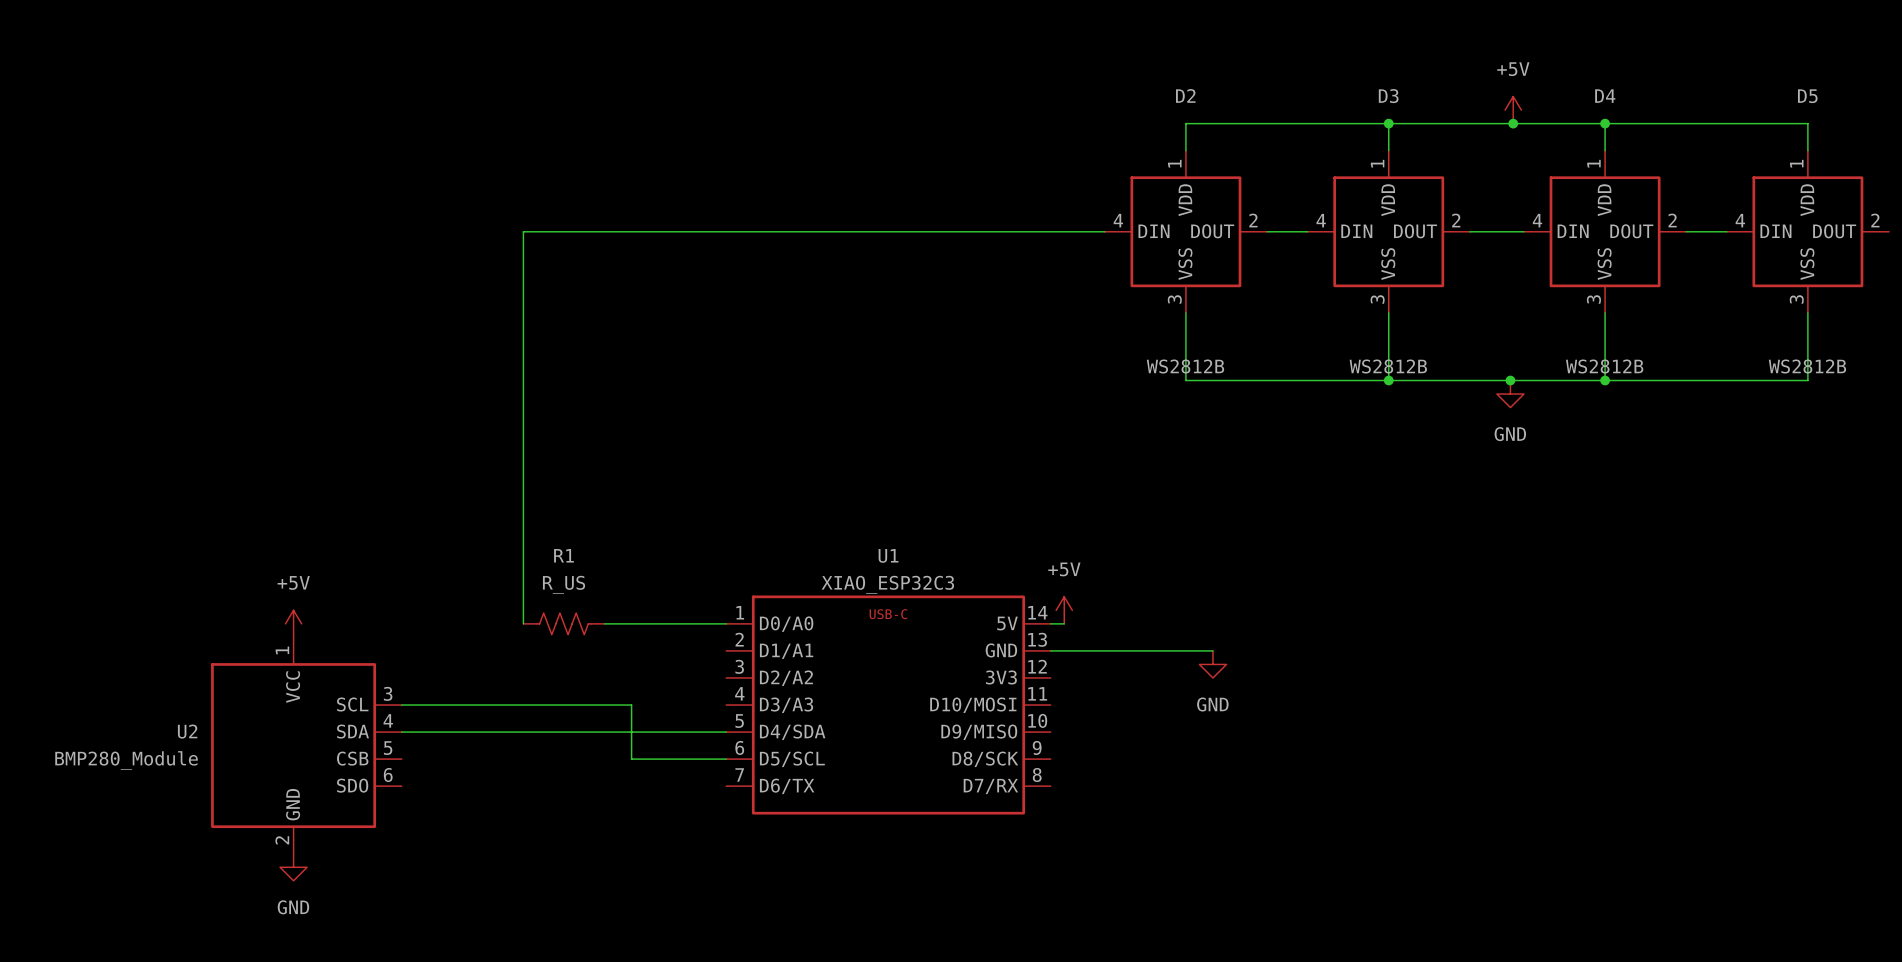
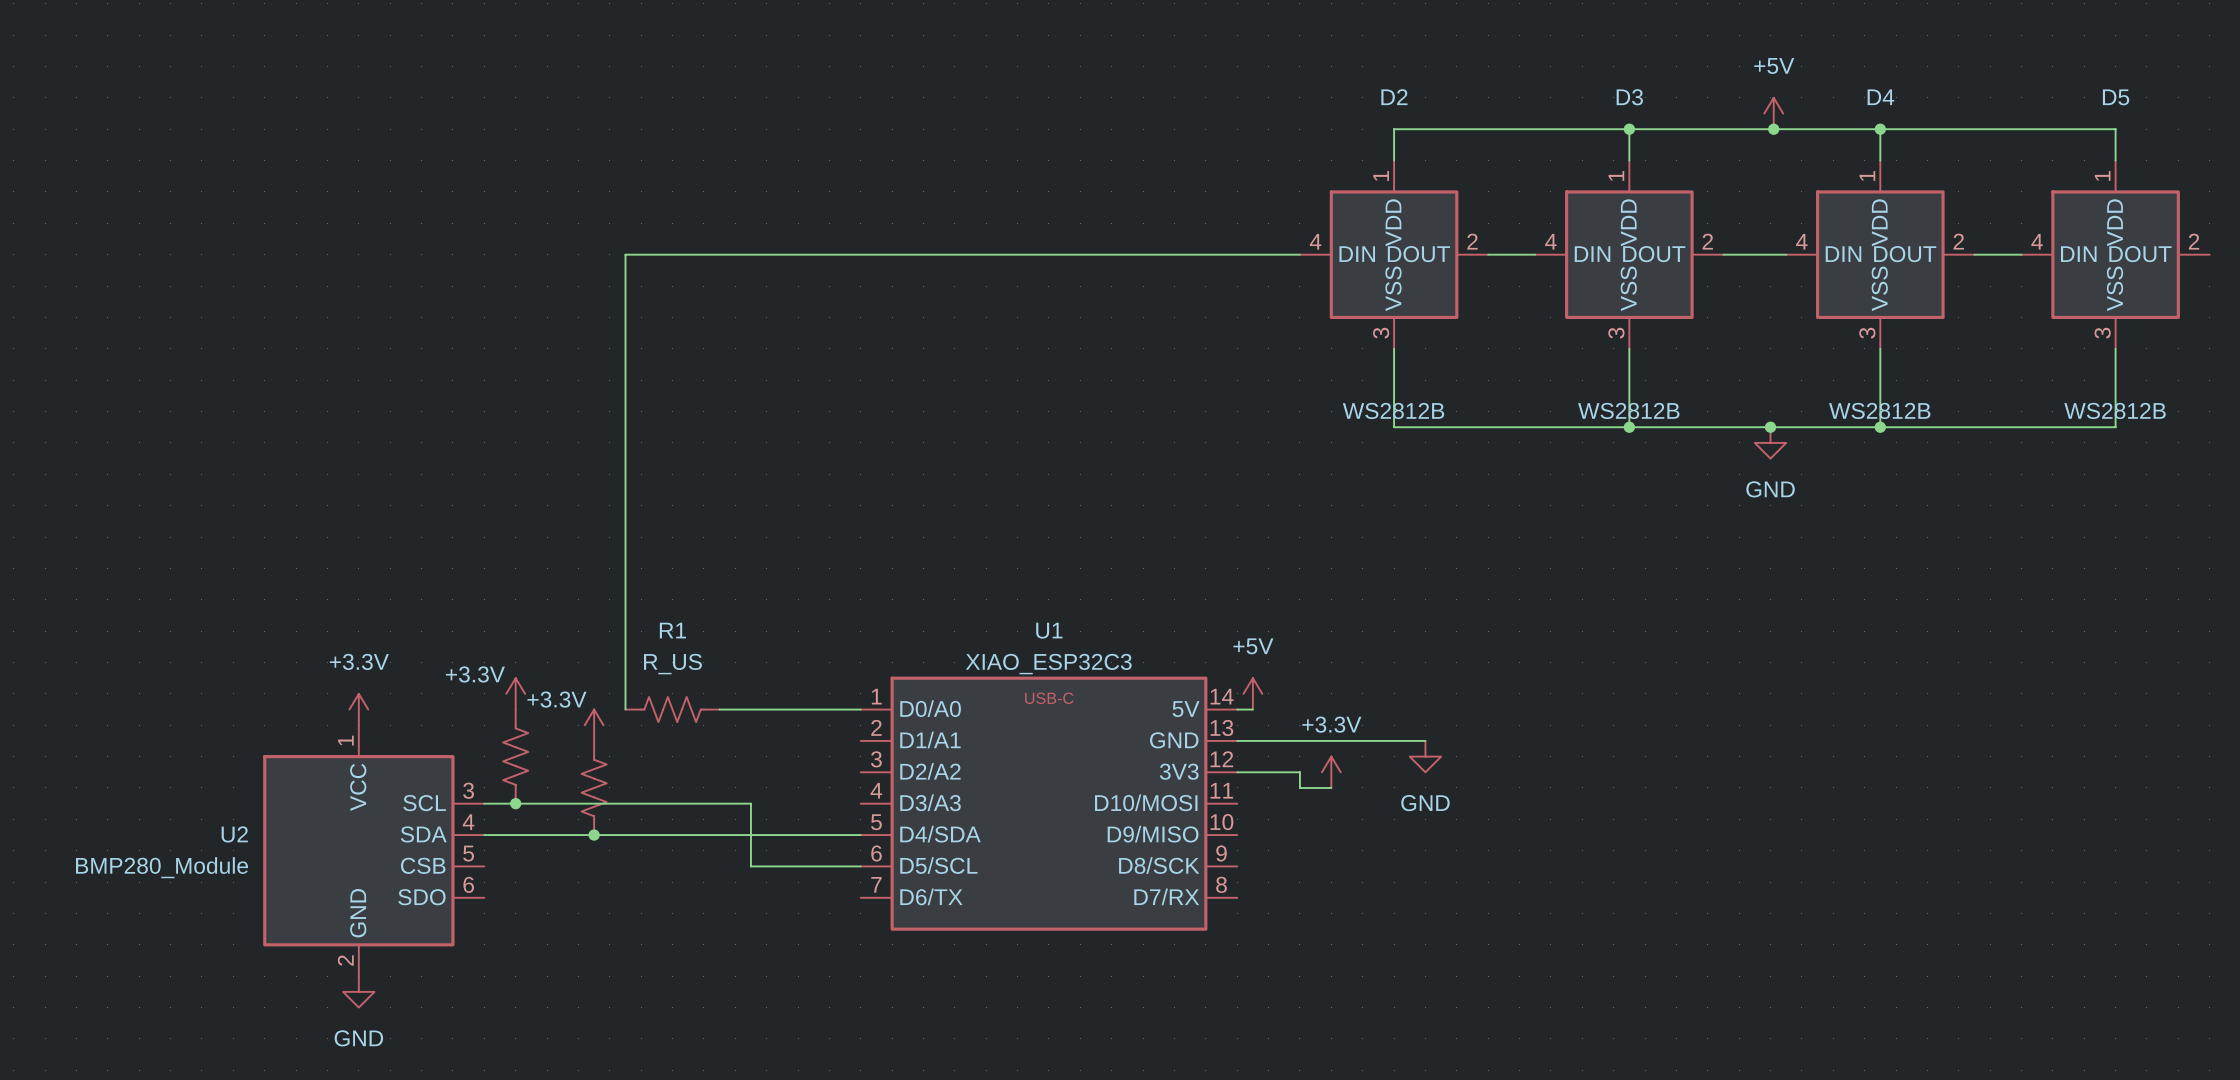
power symbol: none -> +3.3V (515, 693)
power symbol: +5V (293, 623) -> +3.3V (358, 709)
power symbol: none -> +3.3V (594, 725)
part: none -> (515, 756)
wire: none -> (1237, 772) (1299, 772) (1299, 787) (1331, 787)
power symbol: none -> +3.3V (1331, 772)
part: none -> (594, 787)
junction: none -> (515, 803)
junction: none -> (594, 835)

